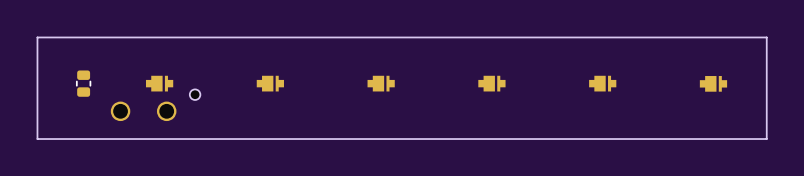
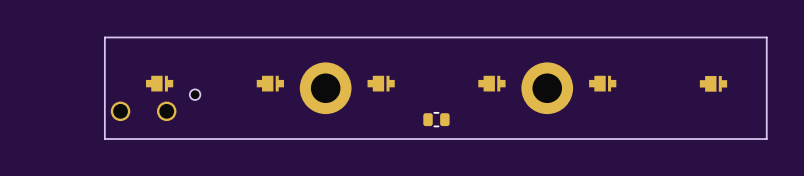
board edge: (104, 37) (37, 37) (37, 139) (104, 139) -> (104, 37) (104, 139)
part: (83, 83) -> none
part: none -> (325, 88)
part: none -> (547, 88)
part: none -> (436, 119)

